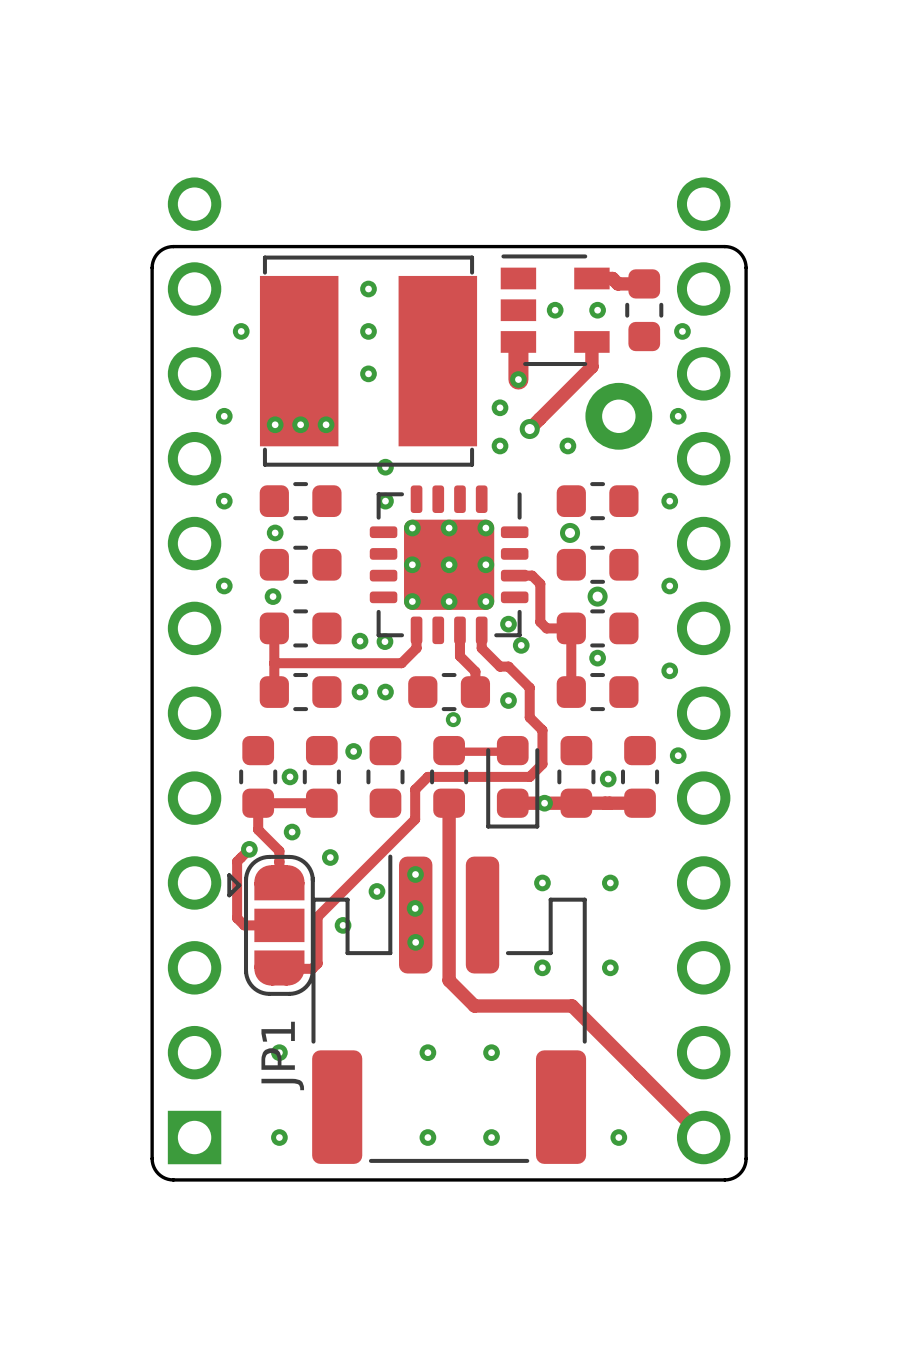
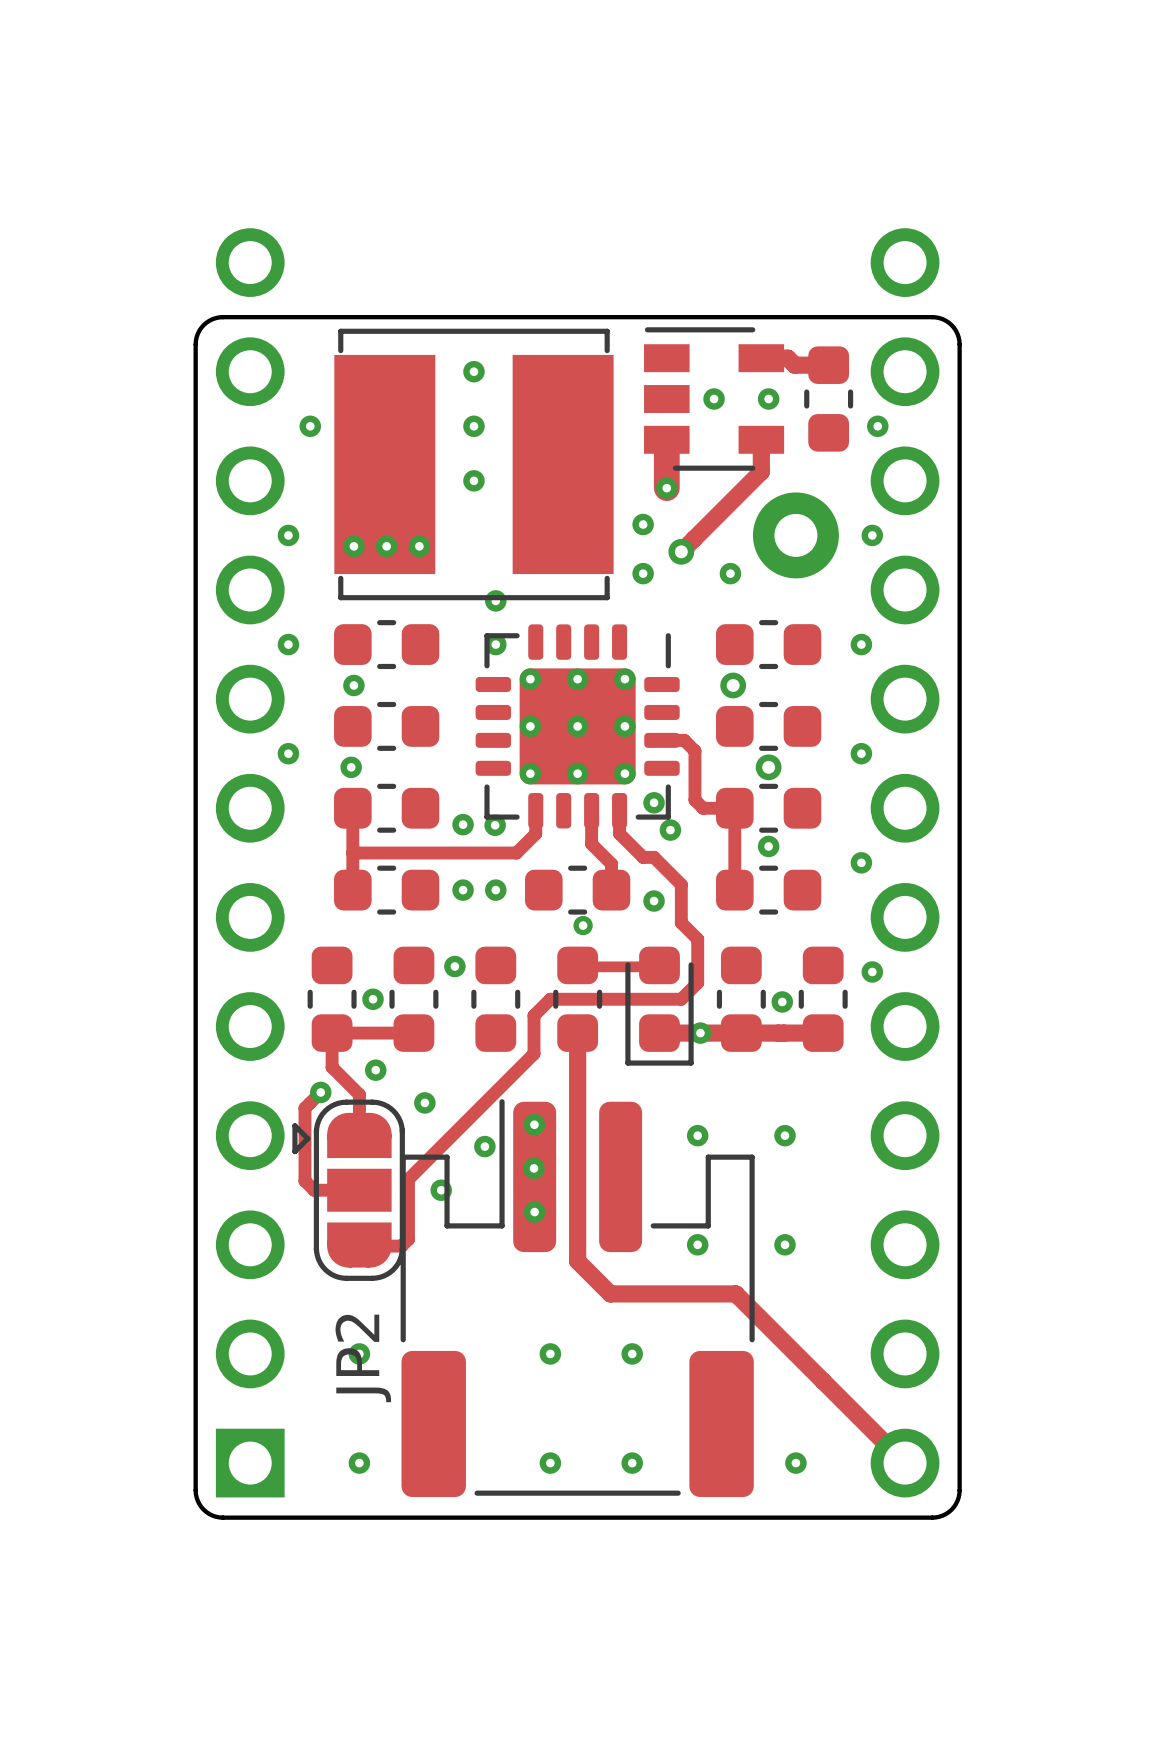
JP1 name: JP1 (282, 1055) -> JP2 (363, 1358)

